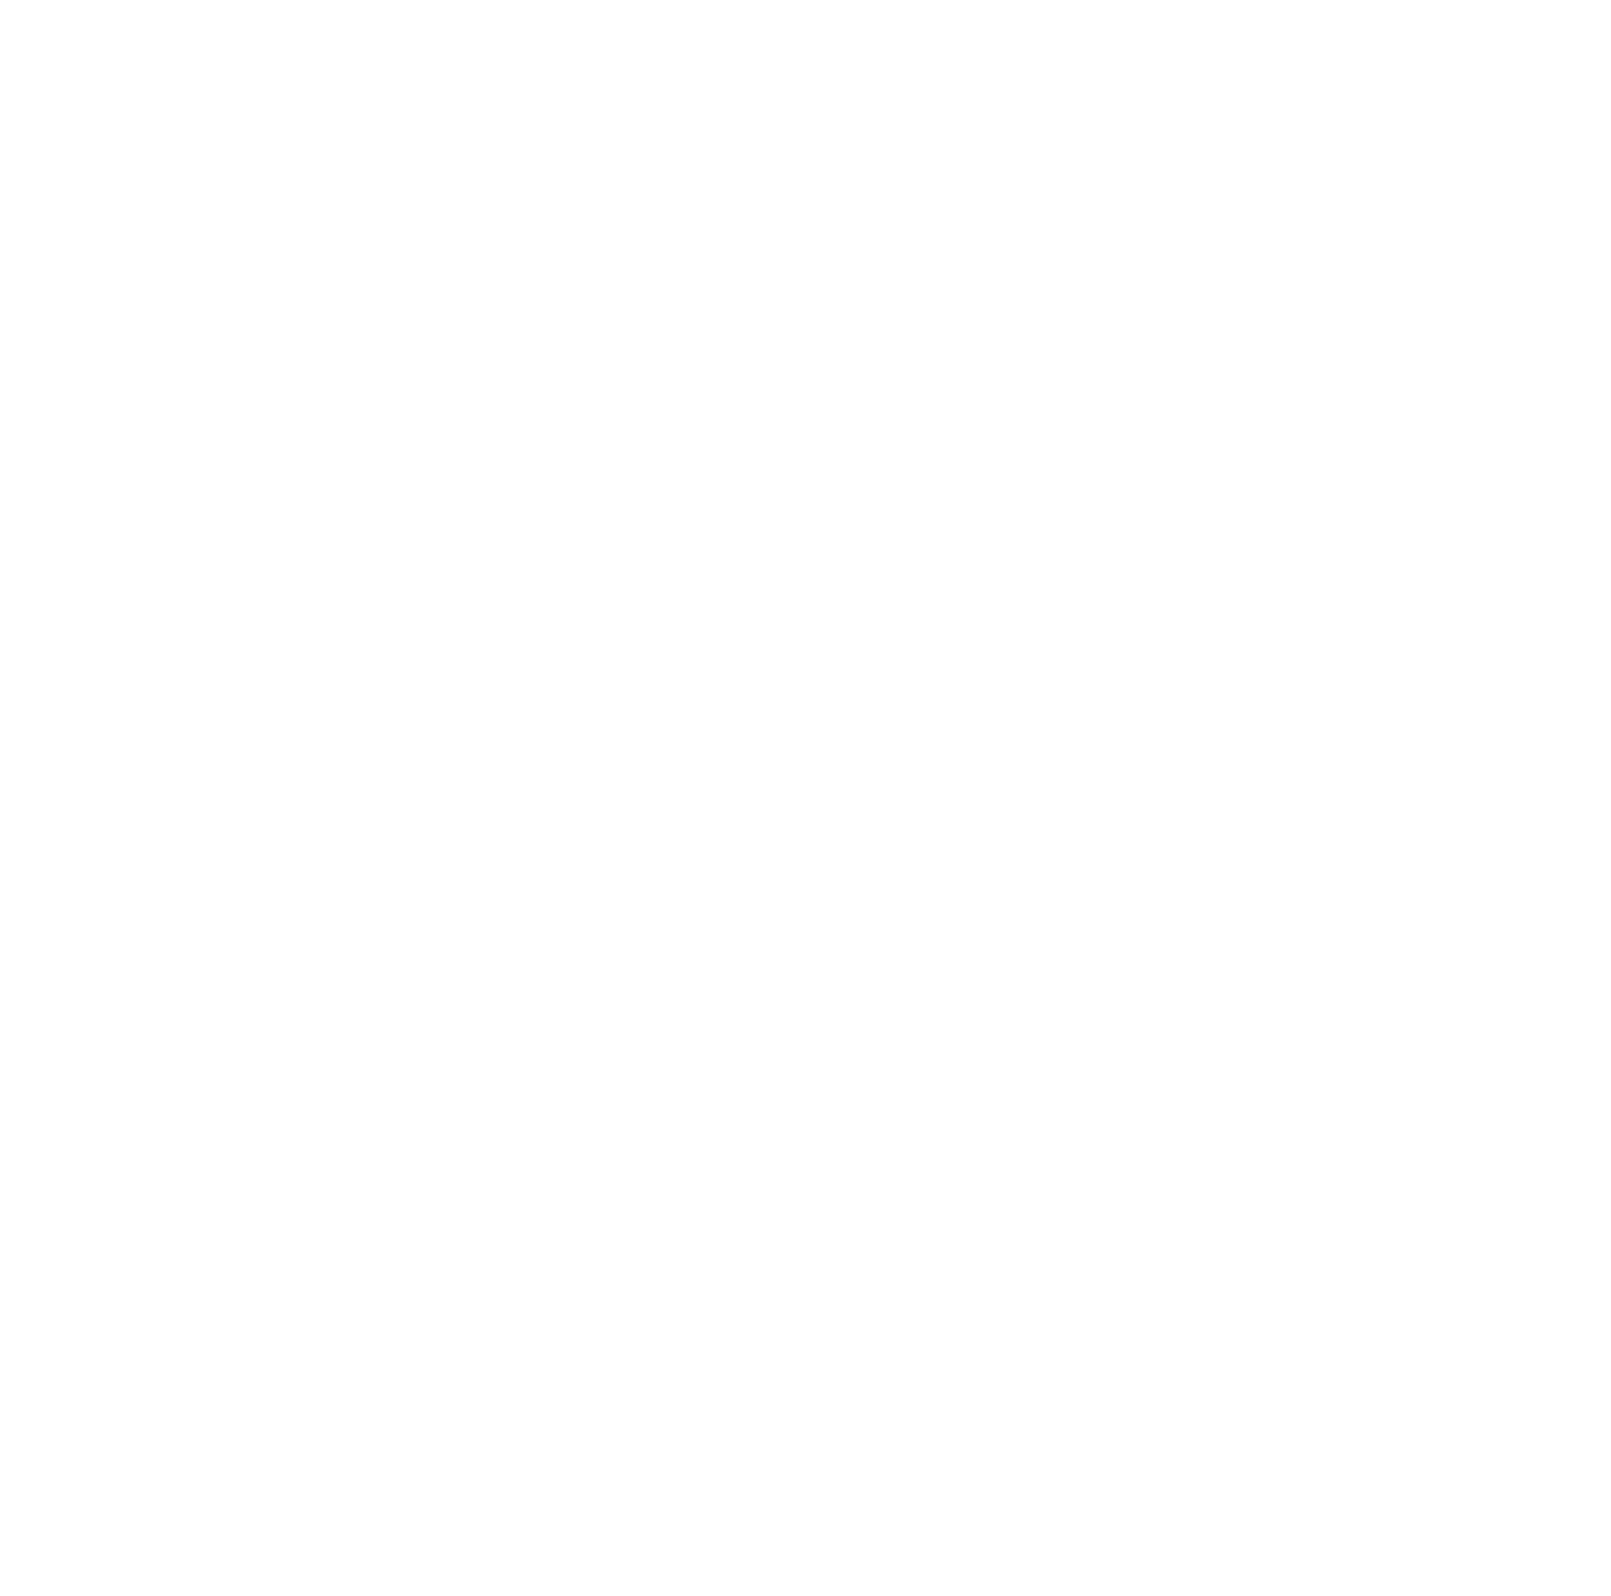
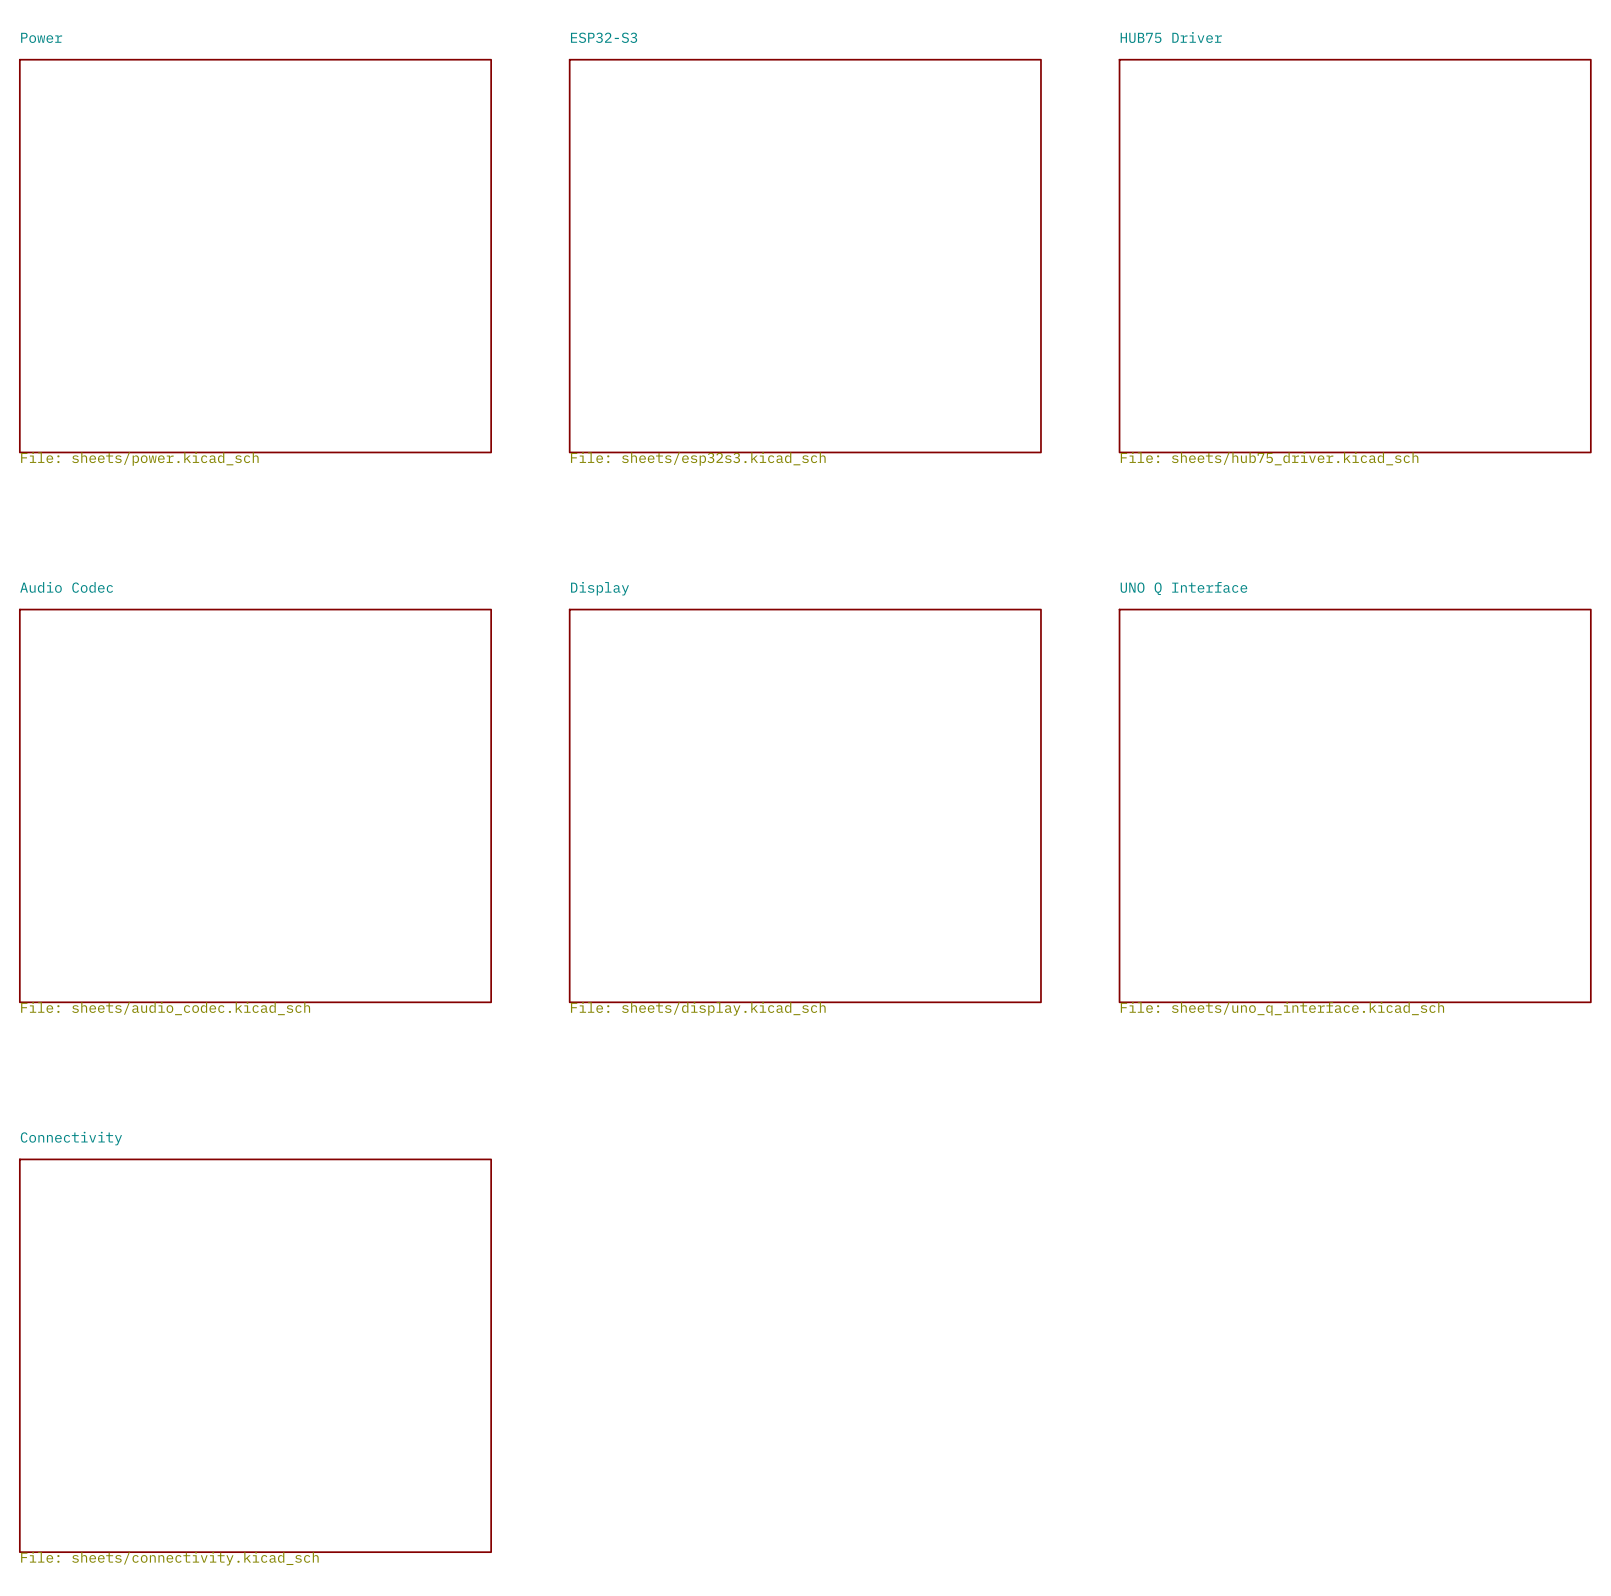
sheet Power: none -> File: sheets/power.kicad_sch (255, 256)
sheet ESP32-S3: none -> File: sheets/esp32s3.kicad_sch (805, 256)
sheet HUB75 Driver: none -> File: sheets/hub75_driver.kicad_sch (1355, 256)
sheet Audio Codec: none -> File: sheets/audio_codec.kicad_sch (255, 805)
sheet Display: none -> File: sheets/display.kicad_sch (805, 805)
sheet UNO Q Interface: none -> File: sheets/uno_q_interface.kicad_sch (1355, 805)
sheet Connectivity: none -> File: sheets/connectivity.kicad_sch (255, 1355)

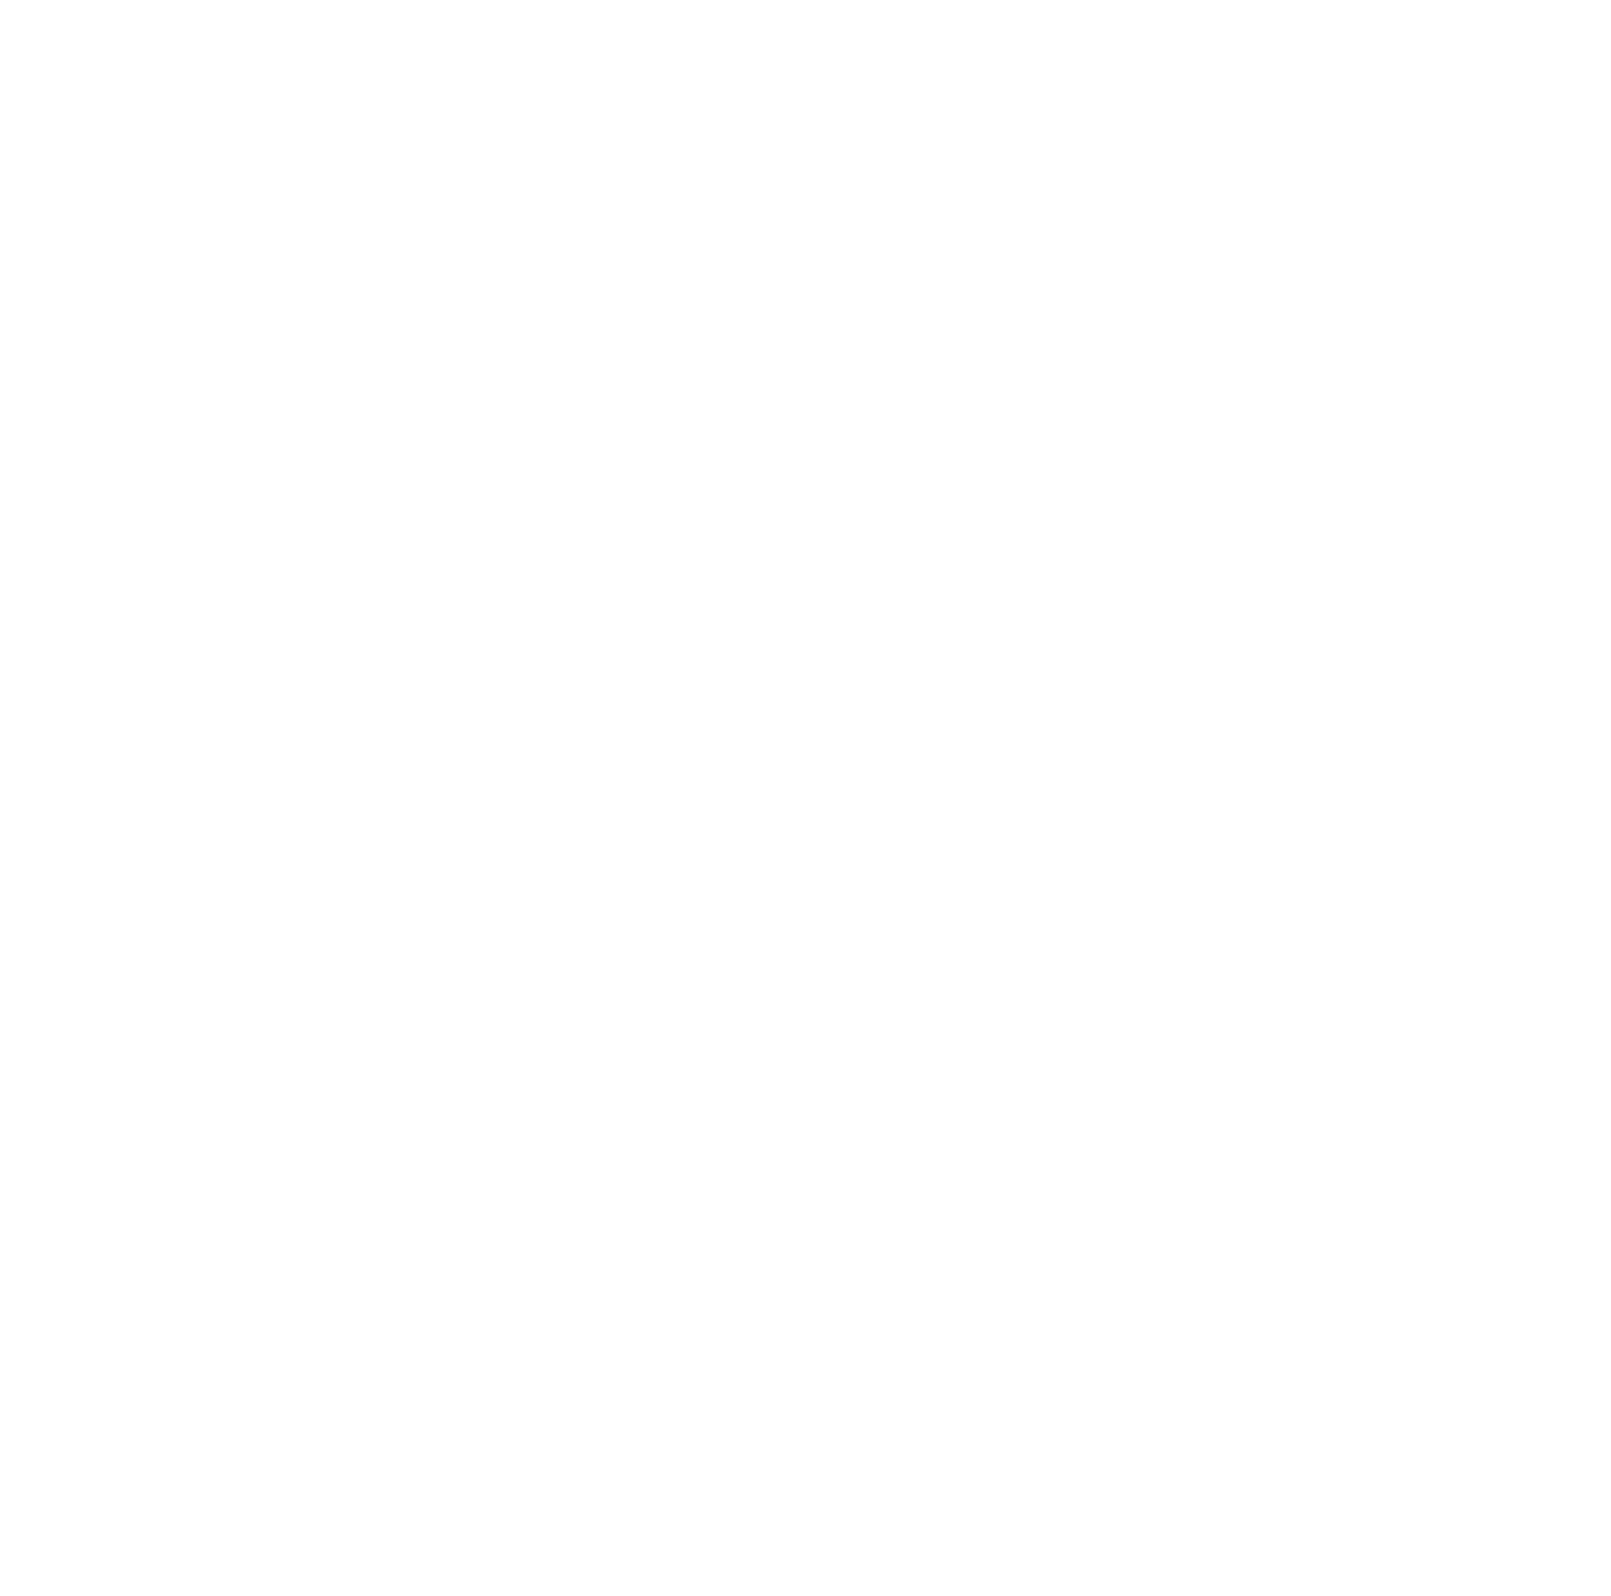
sheet Power: File: sheets/power.kicad_sch (255, 256) -> none
sheet ESP32-S3: File: sheets/esp32s3.kicad_sch (805, 256) -> none
sheet HUB75 Driver: File: sheets/hub75_driver.kicad_sch (1355, 256) -> none
sheet Audio Codec: File: sheets/audio_codec.kicad_sch (255, 805) -> none
sheet Display: File: sheets/display.kicad_sch (805, 805) -> none
sheet UNO Q Interface: File: sheets/uno_q_interface.kicad_sch (1355, 805) -> none
sheet Connectivity: File: sheets/connectivity.kicad_sch (255, 1355) -> none

